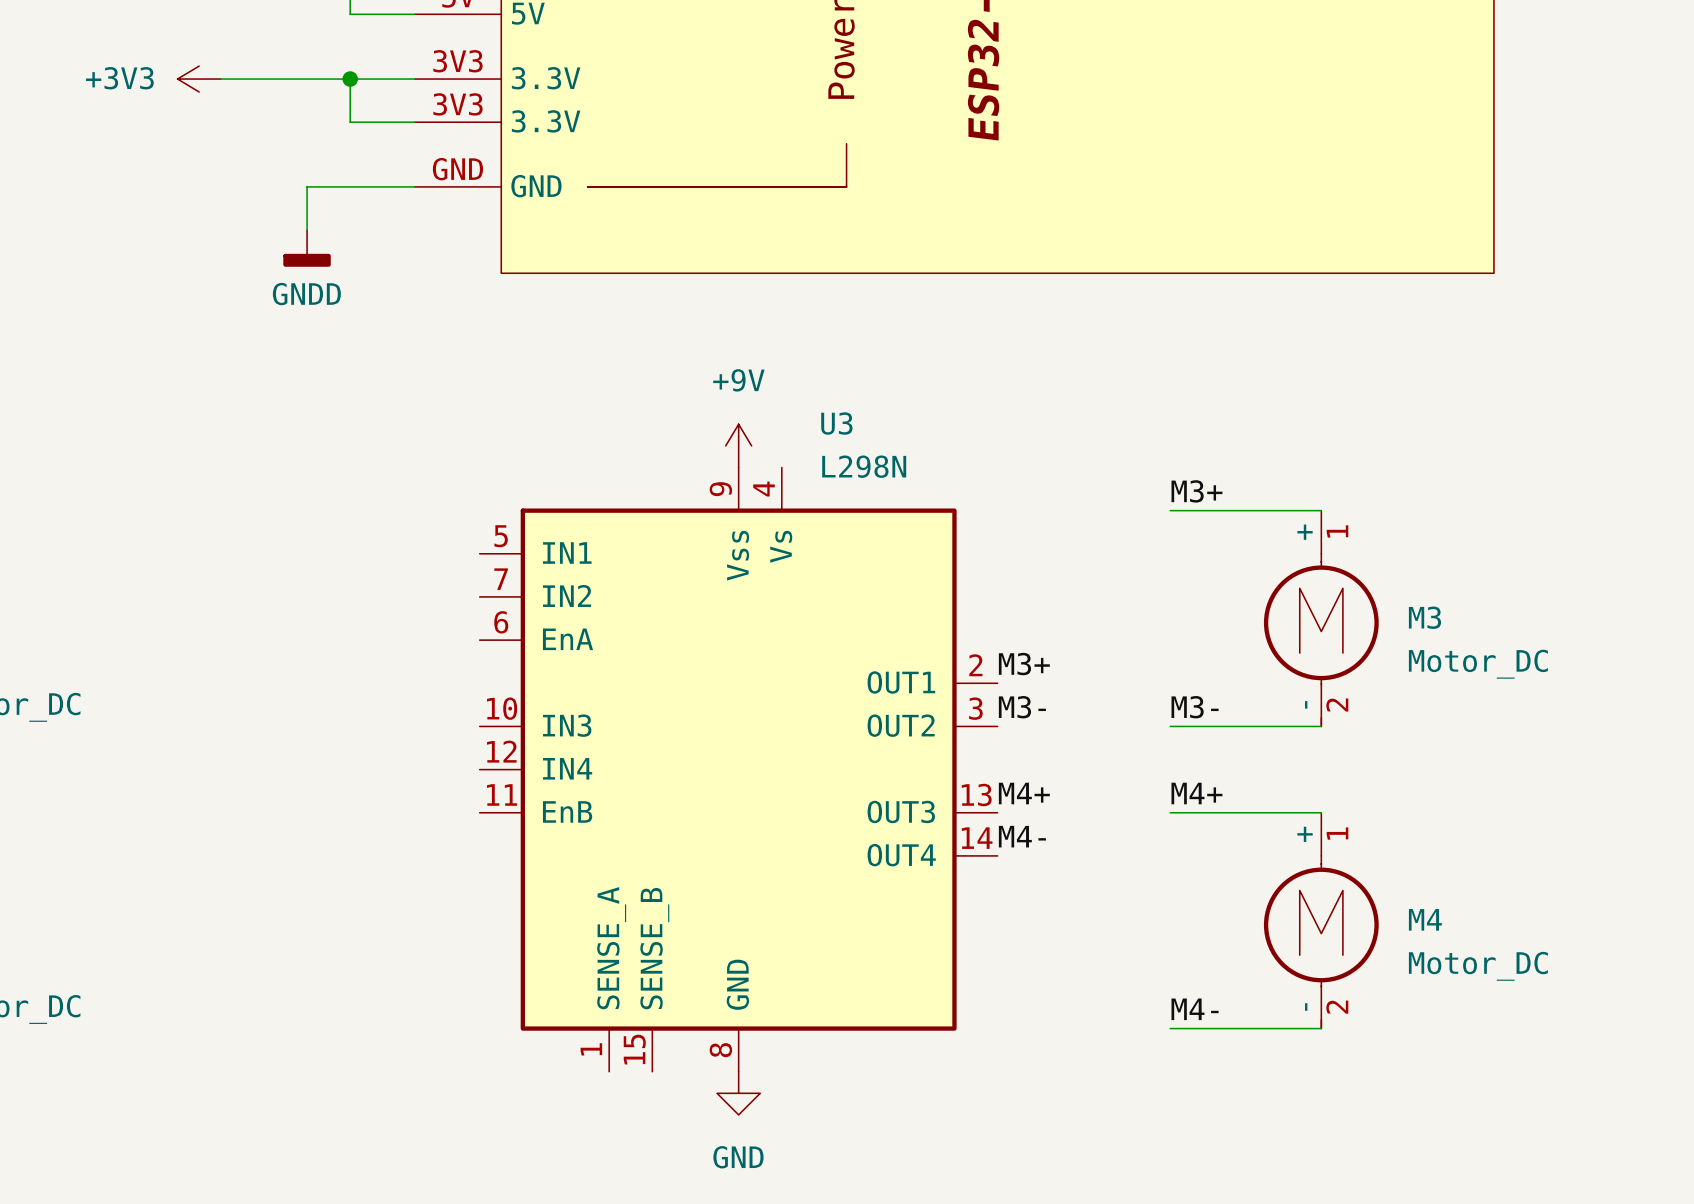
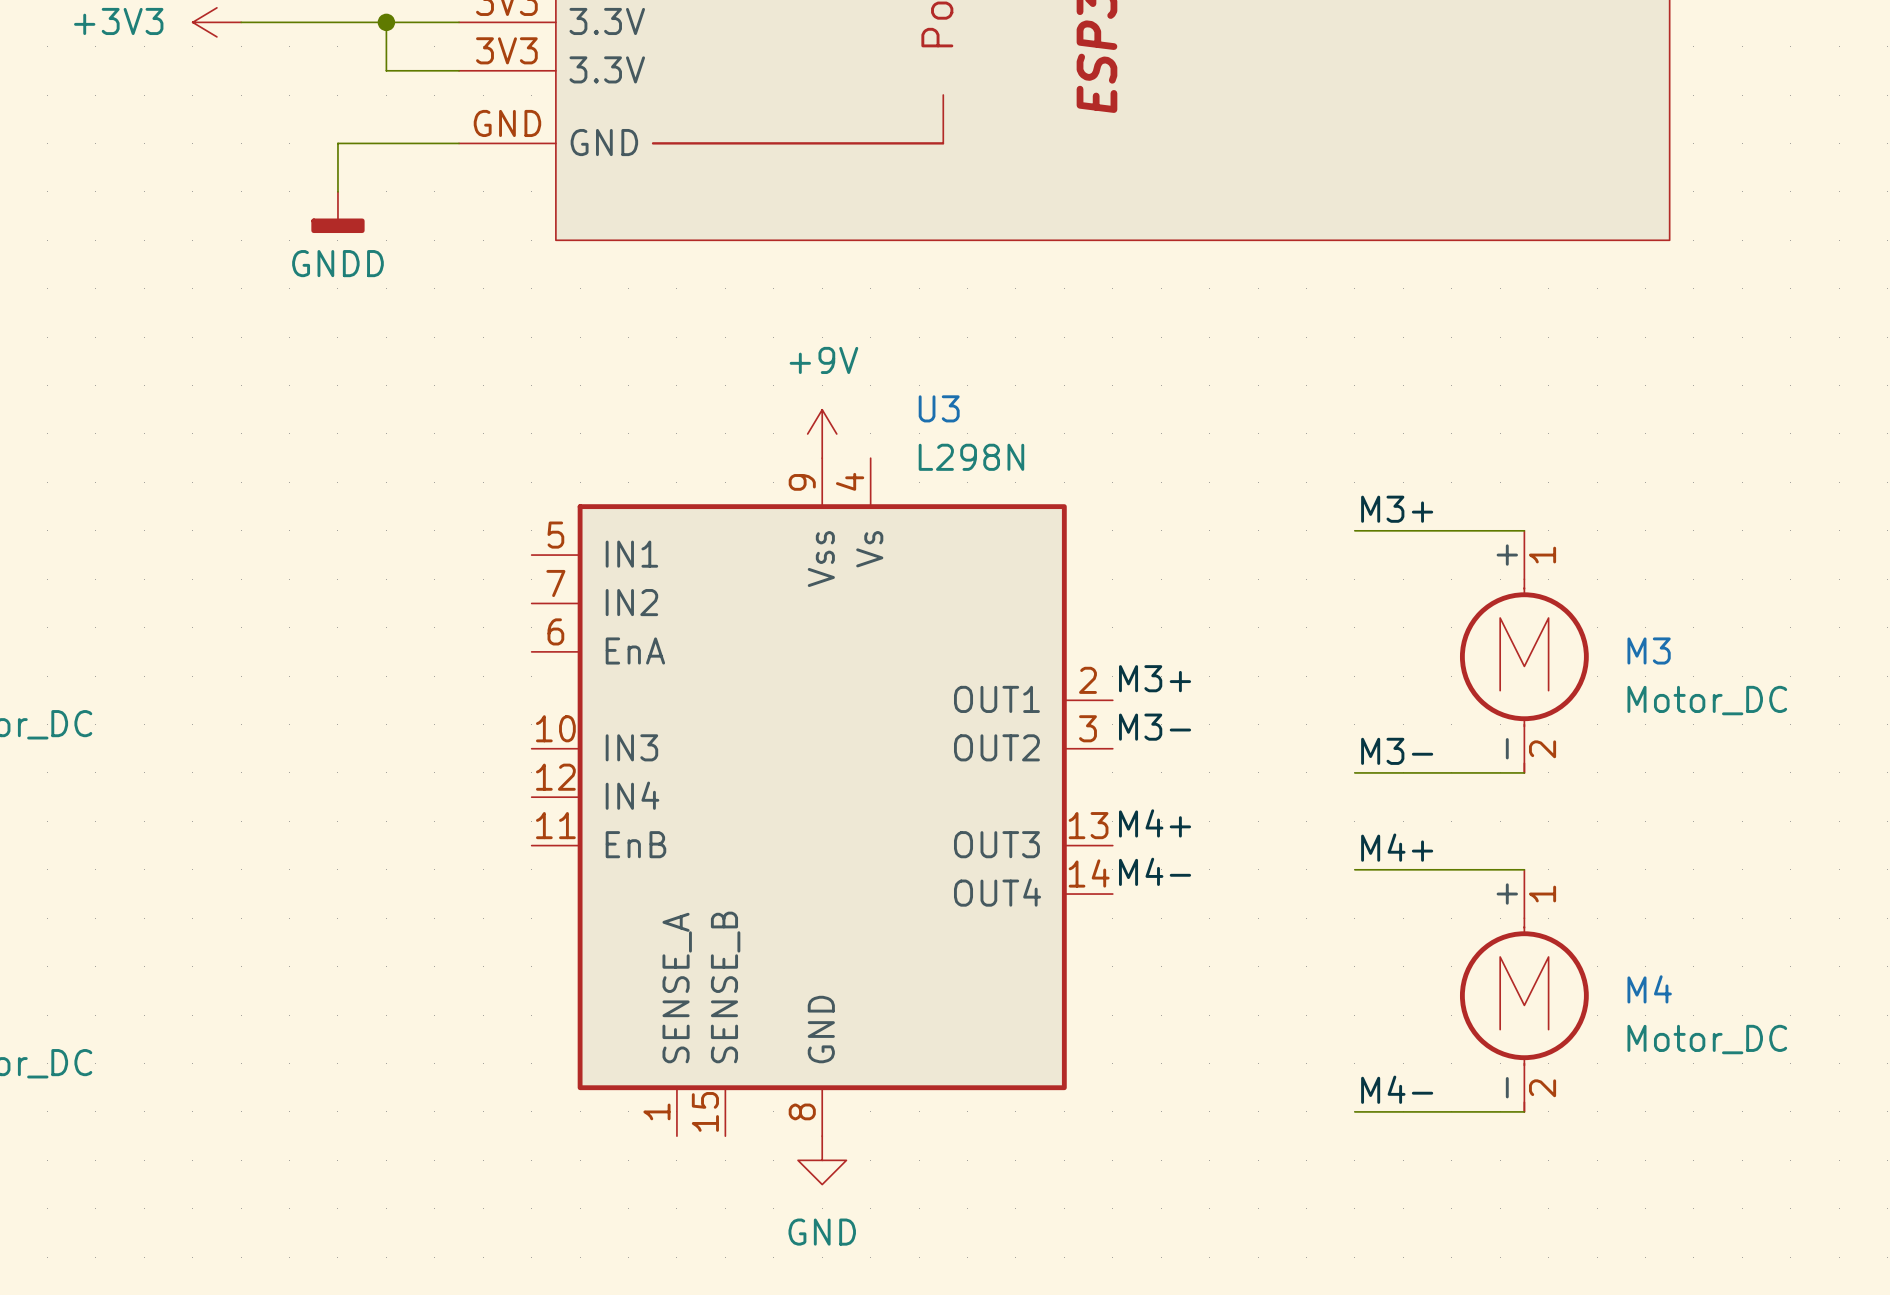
label position: M3+ (1196, 491) -> M3+ (1397, 509)
wire: (1170, 510) (1321, 510) -> (1354, 530) (1524, 530)
M3 position: (1321, 618) -> (1524, 651)
label position: M3- (1195, 707) -> M3- (1397, 751)
wire: (1170, 726) (1321, 726) -> (1354, 772) (1524, 772)
label position: M4+ (1196, 793) -> M4+ (1397, 847)
wire: (1170, 812) (1321, 812) -> (1354, 869) (1524, 869)
M4 position: (1321, 920) -> (1524, 990)
label position: M4- (1195, 1009) -> M4- (1397, 1089)
wire: (1170, 1028) (1321, 1028) -> (1354, 1111) (1524, 1111)

